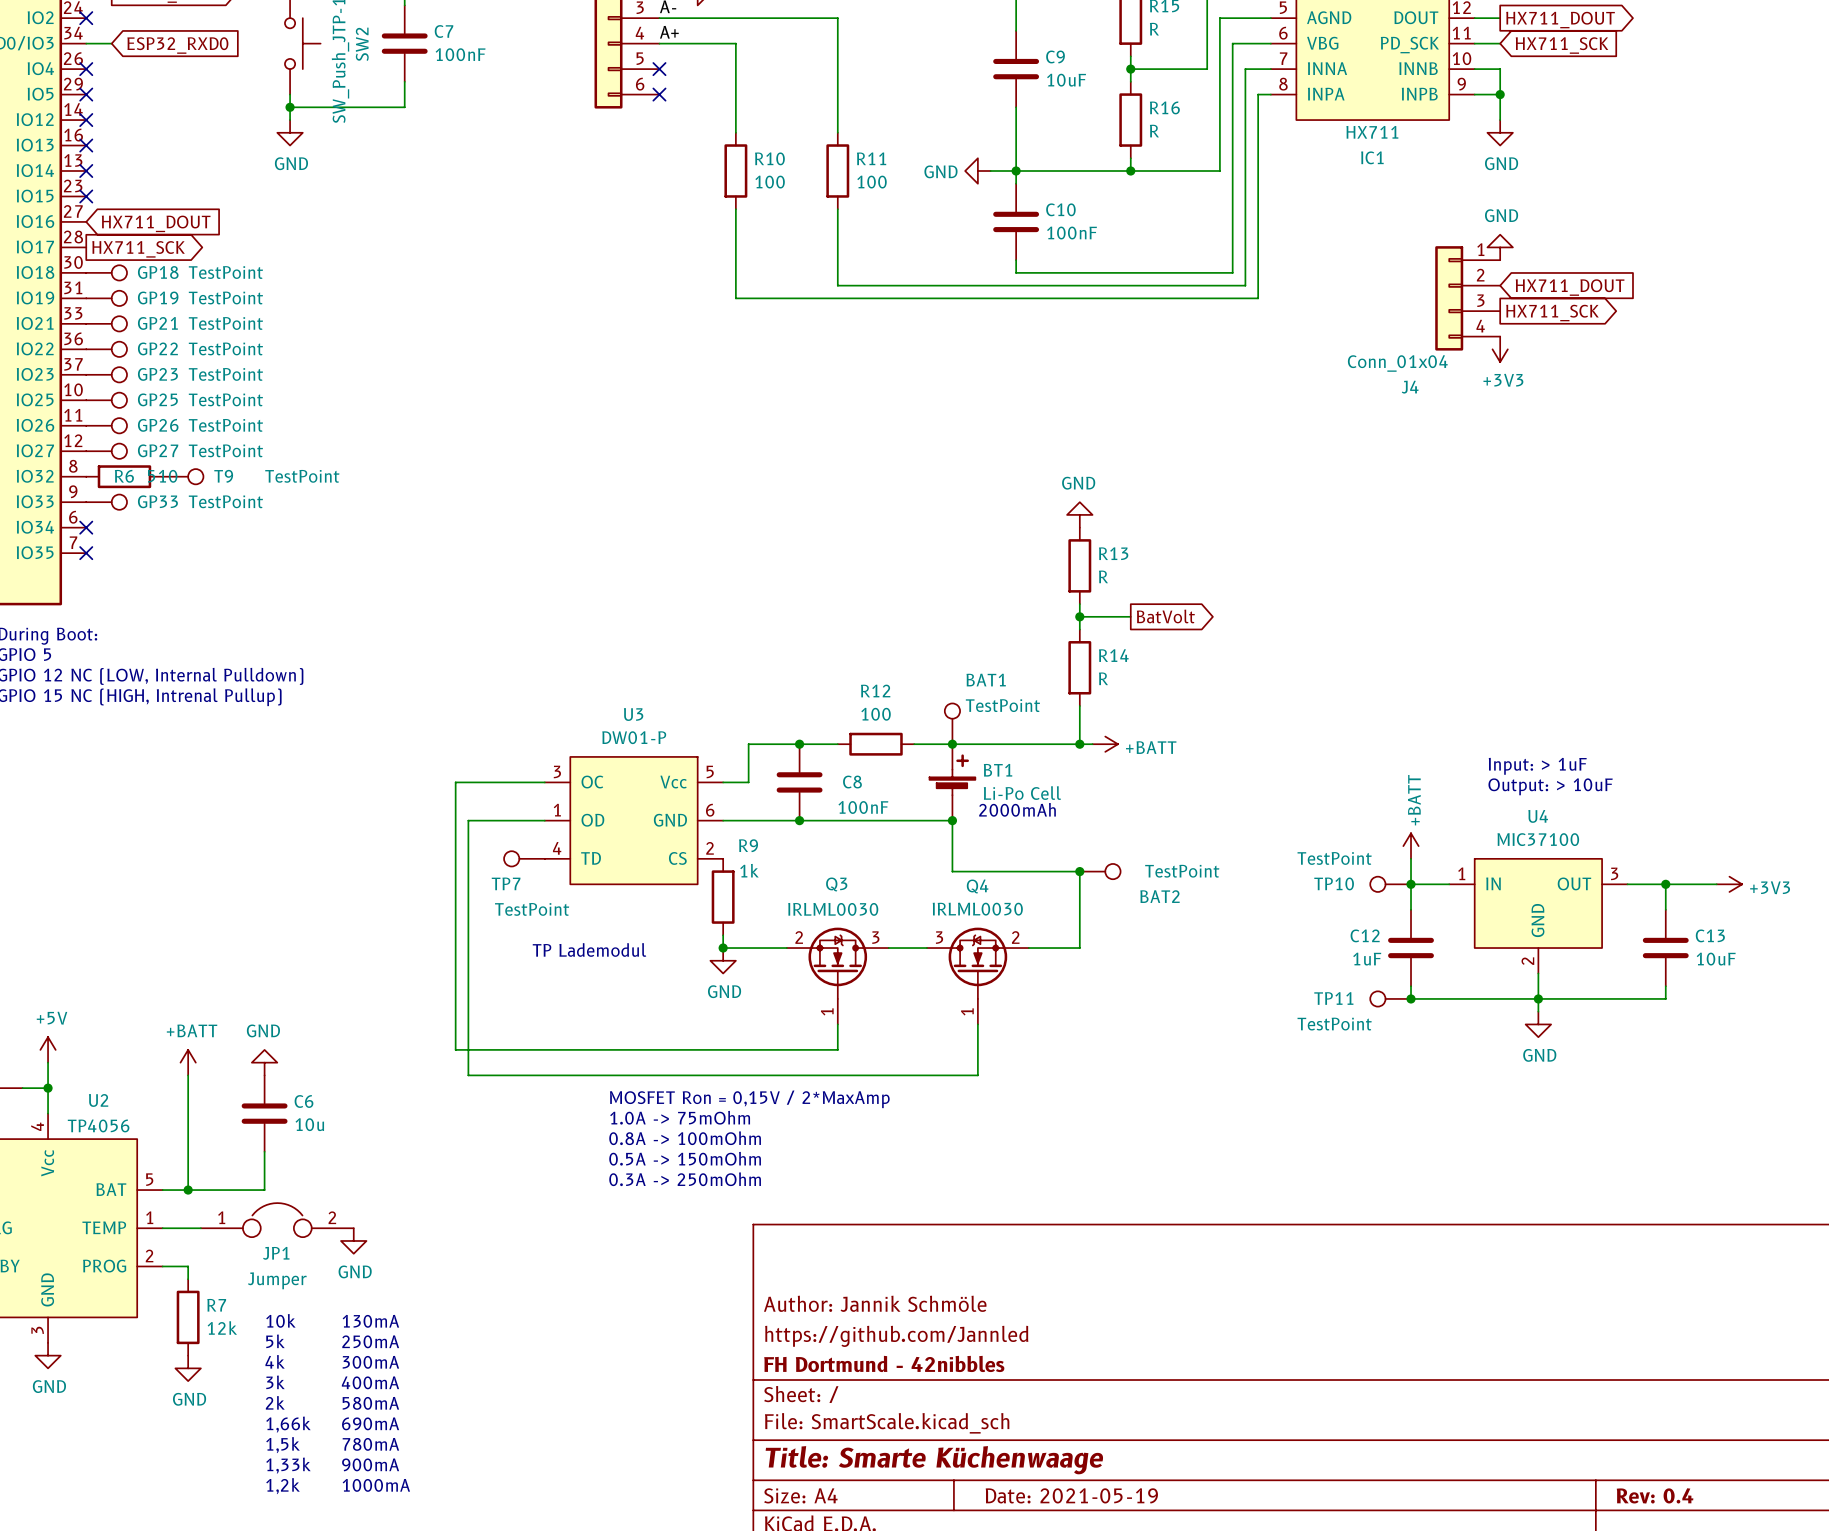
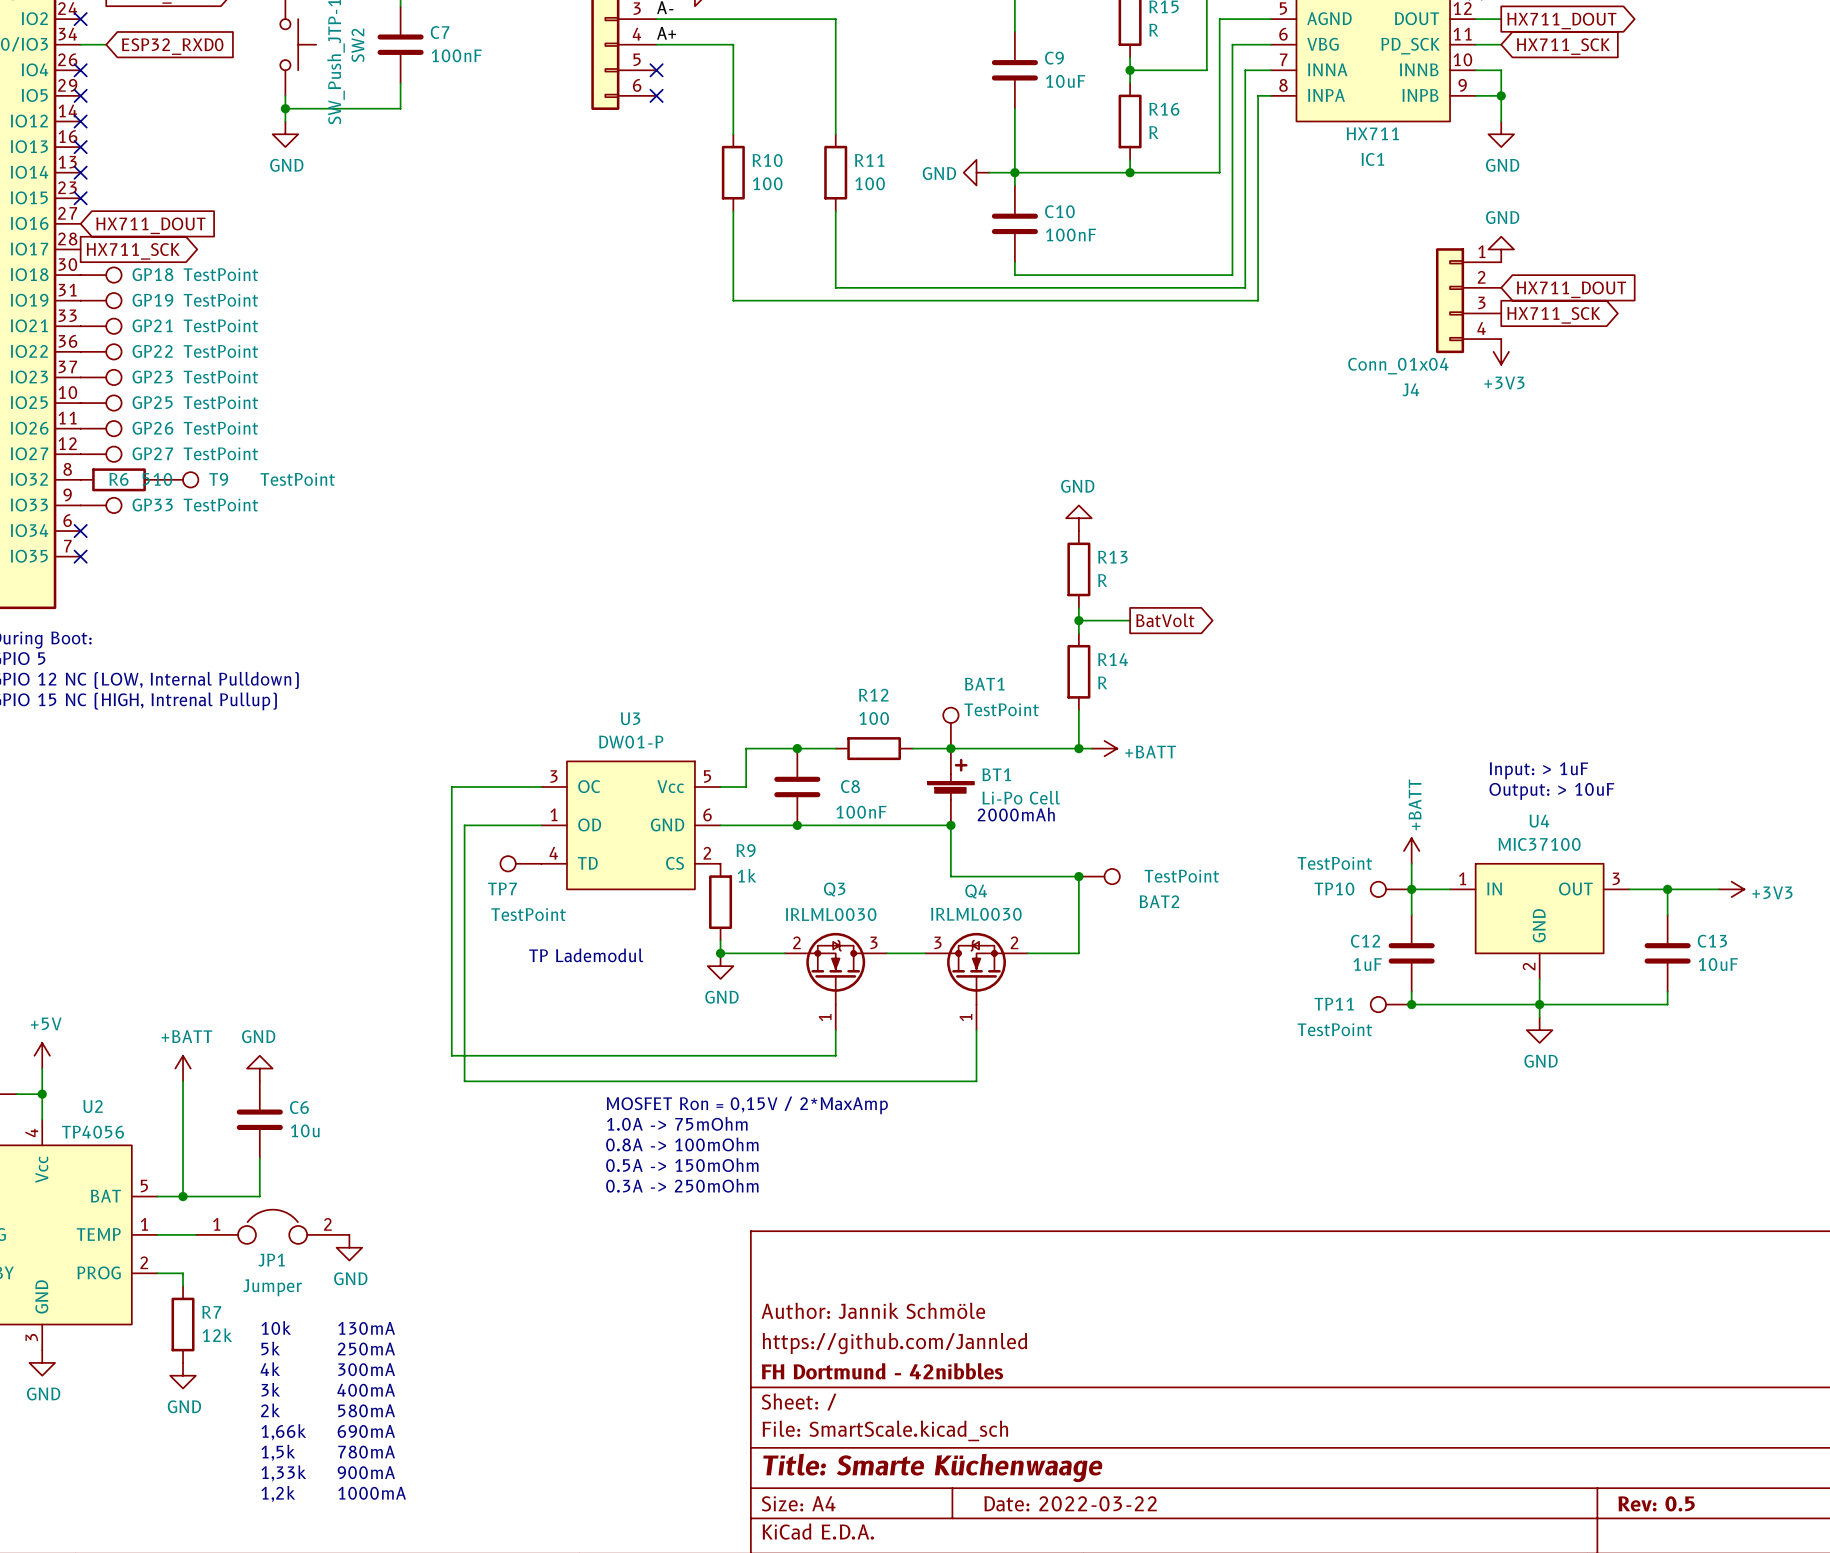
title block: Date: 2021-05-19 (1071, 1495) -> Date: 2022-03-22 (1070, 1503)
title block: Rev: 0.4 (1655, 1495) -> Rev: 0.5 (1656, 1503)

